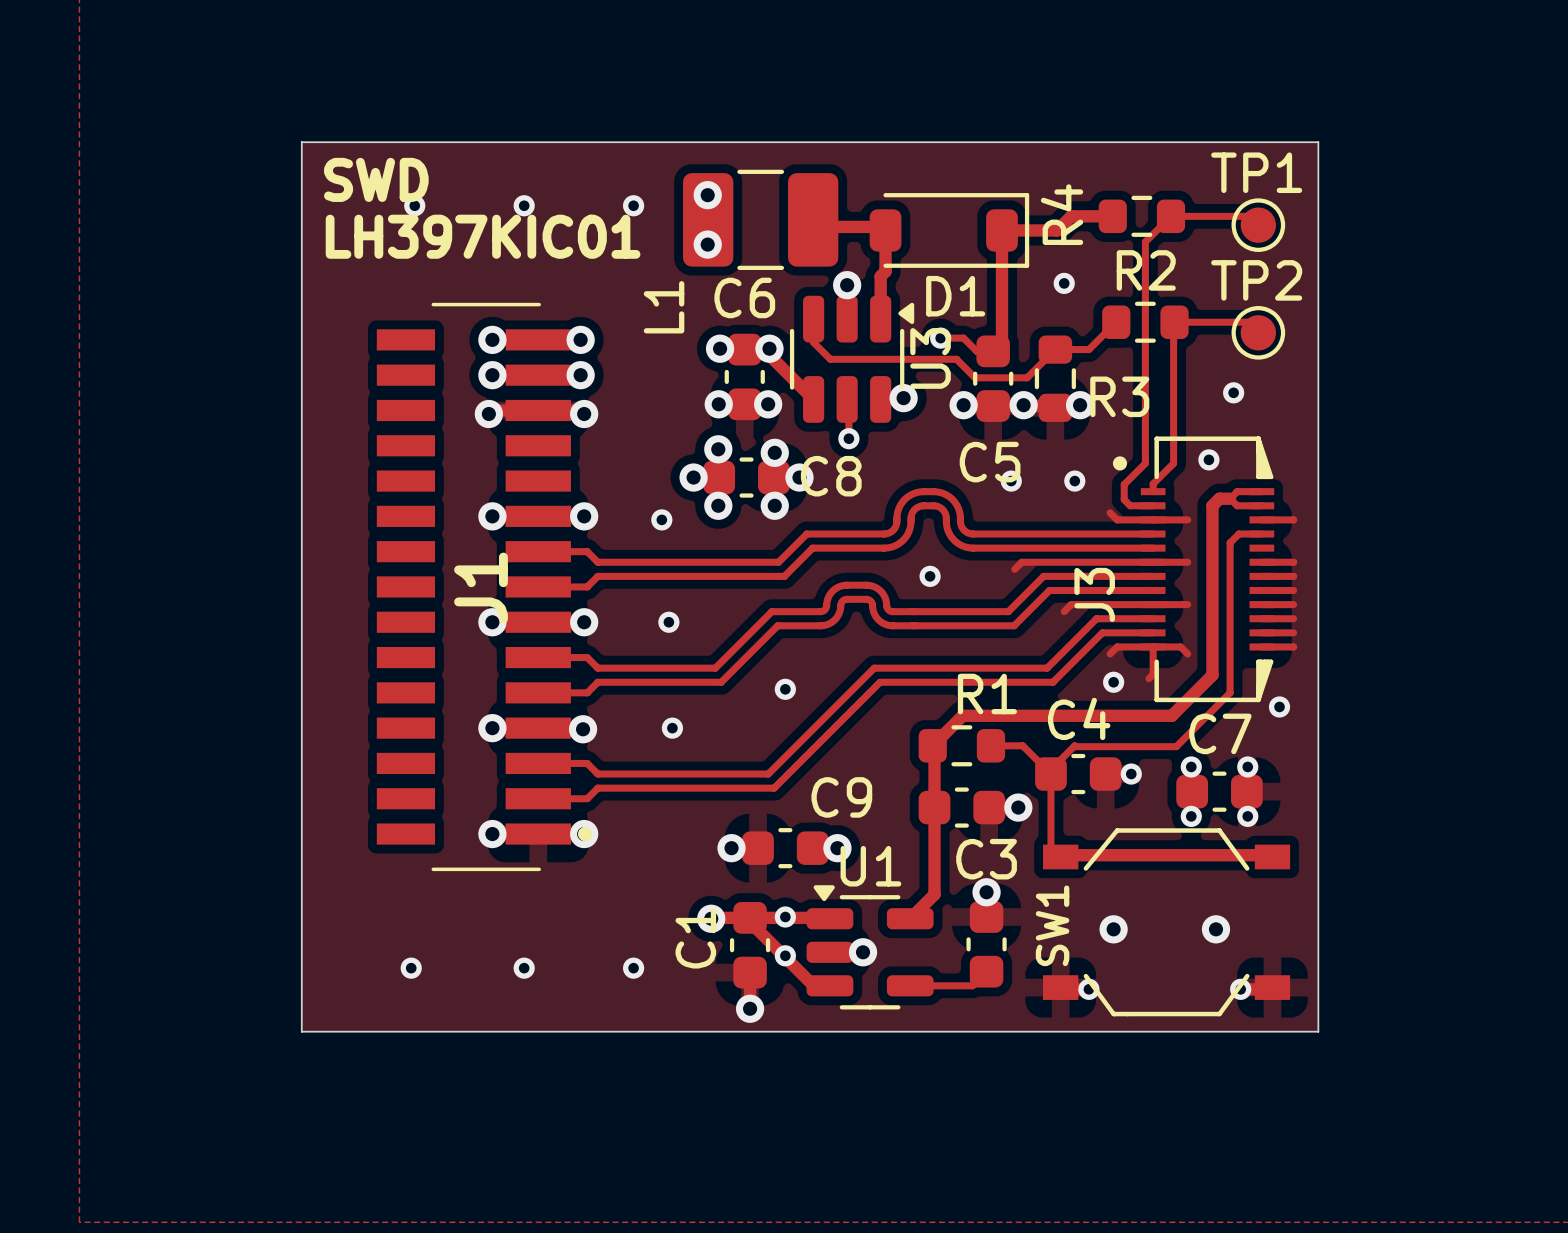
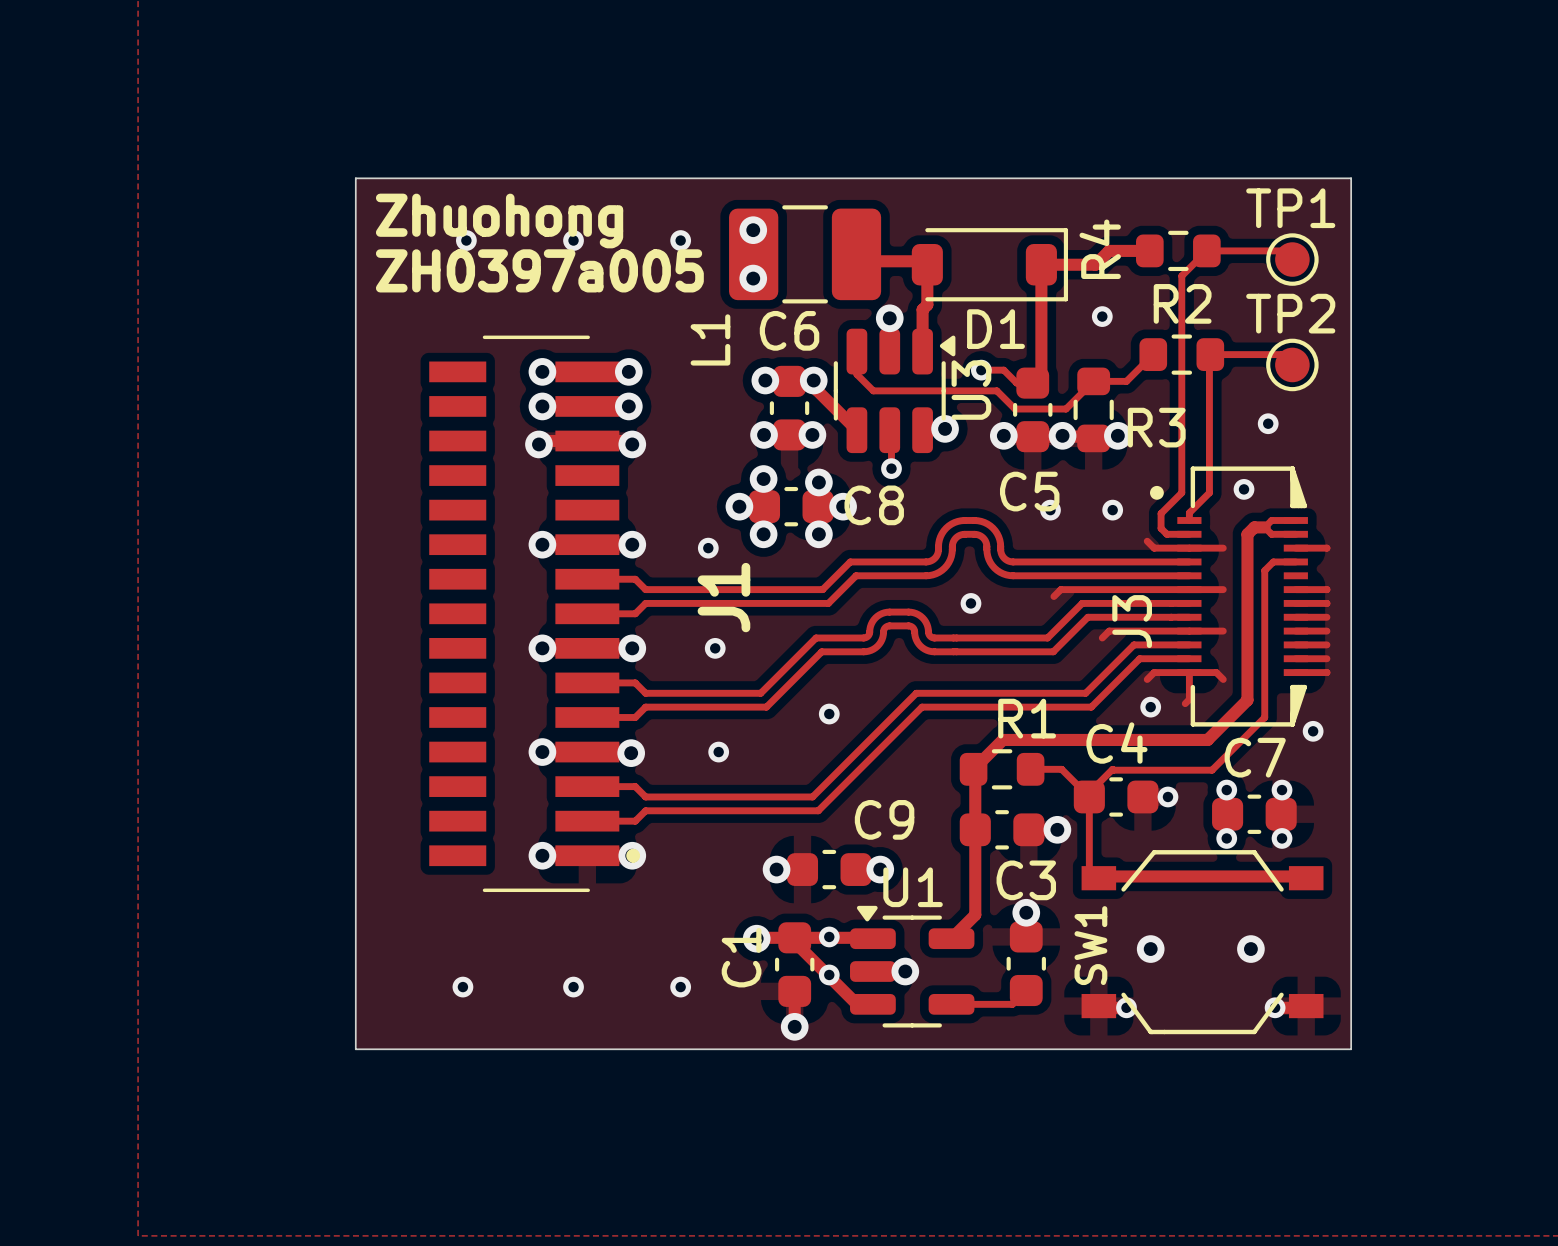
text: SWD (376, 179) -> Zhuohong (499, 220)
text: LH397KIC01 (483, 236) -> ZH0397a005 (539, 270)
J1 name position: J1 (481, 588) -> J1 (723, 597)

